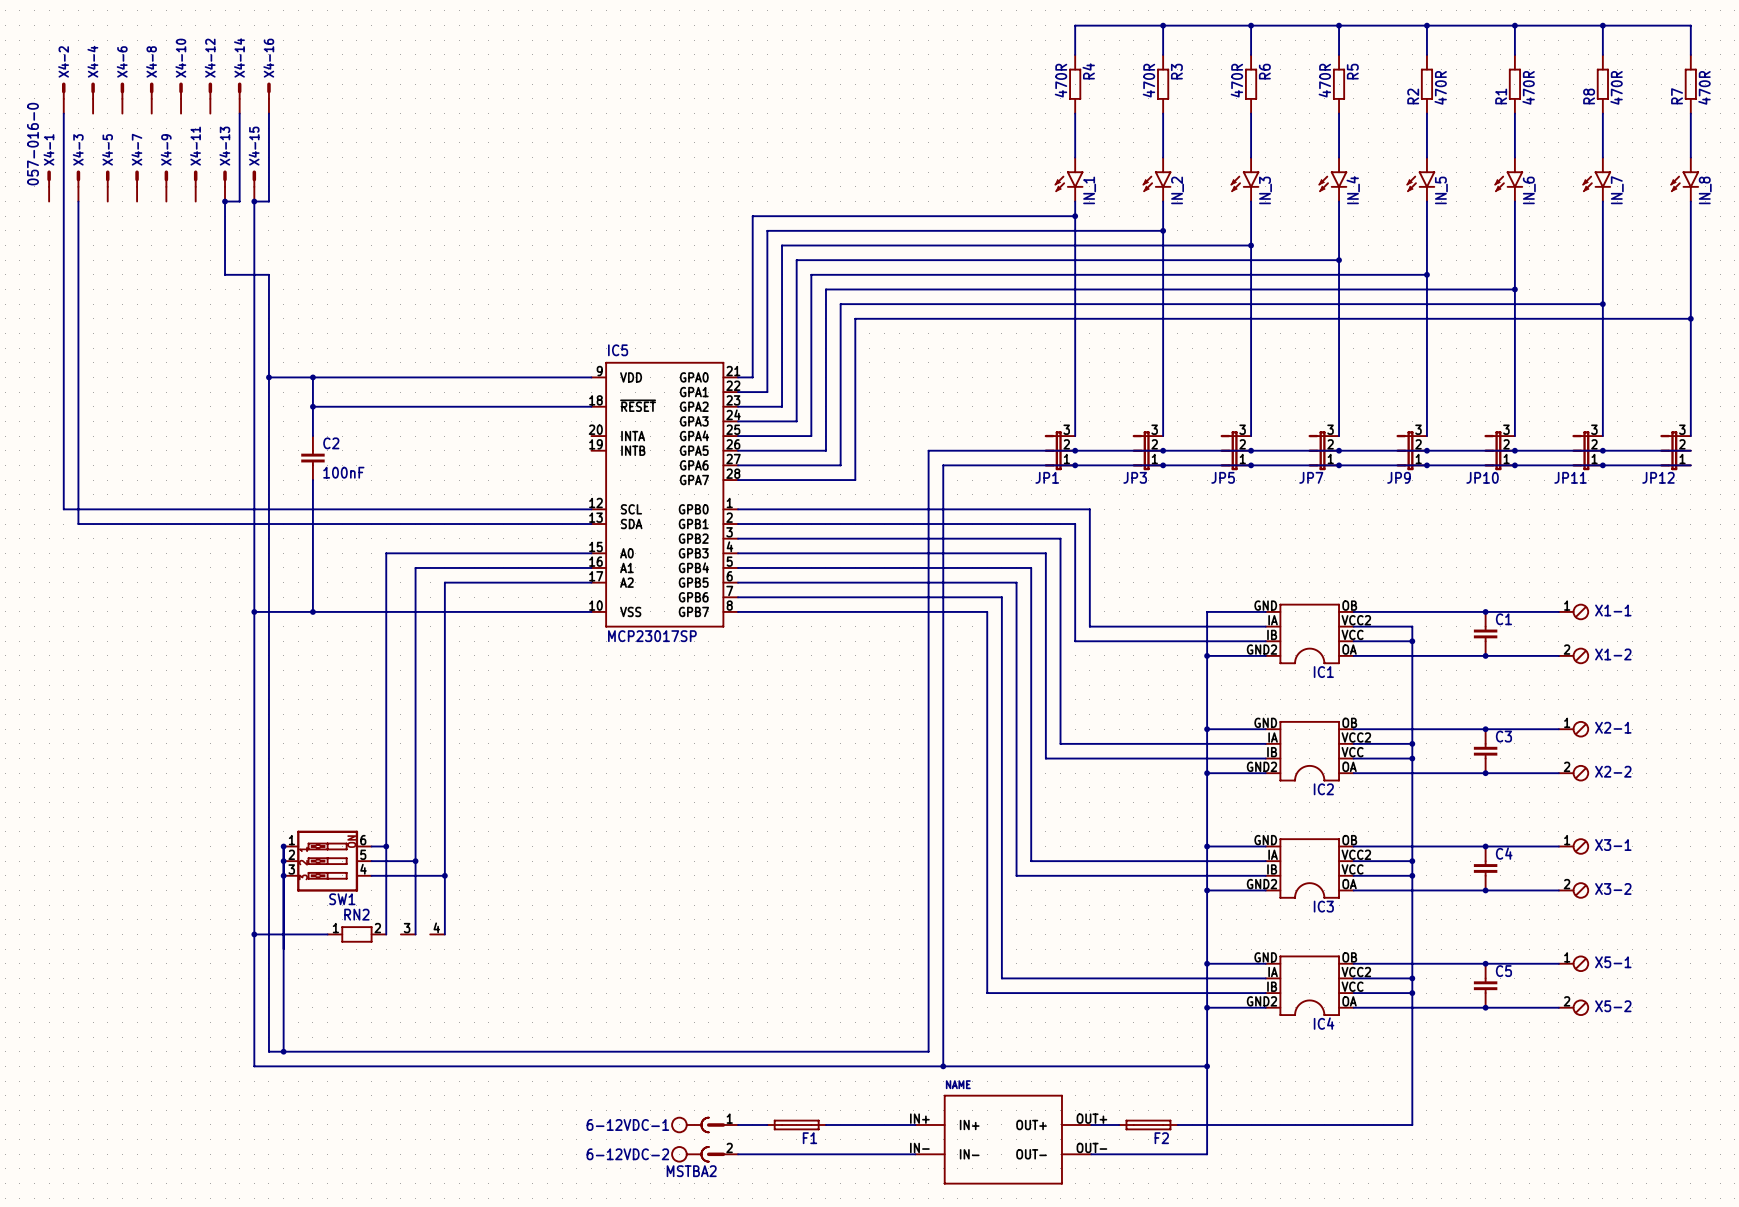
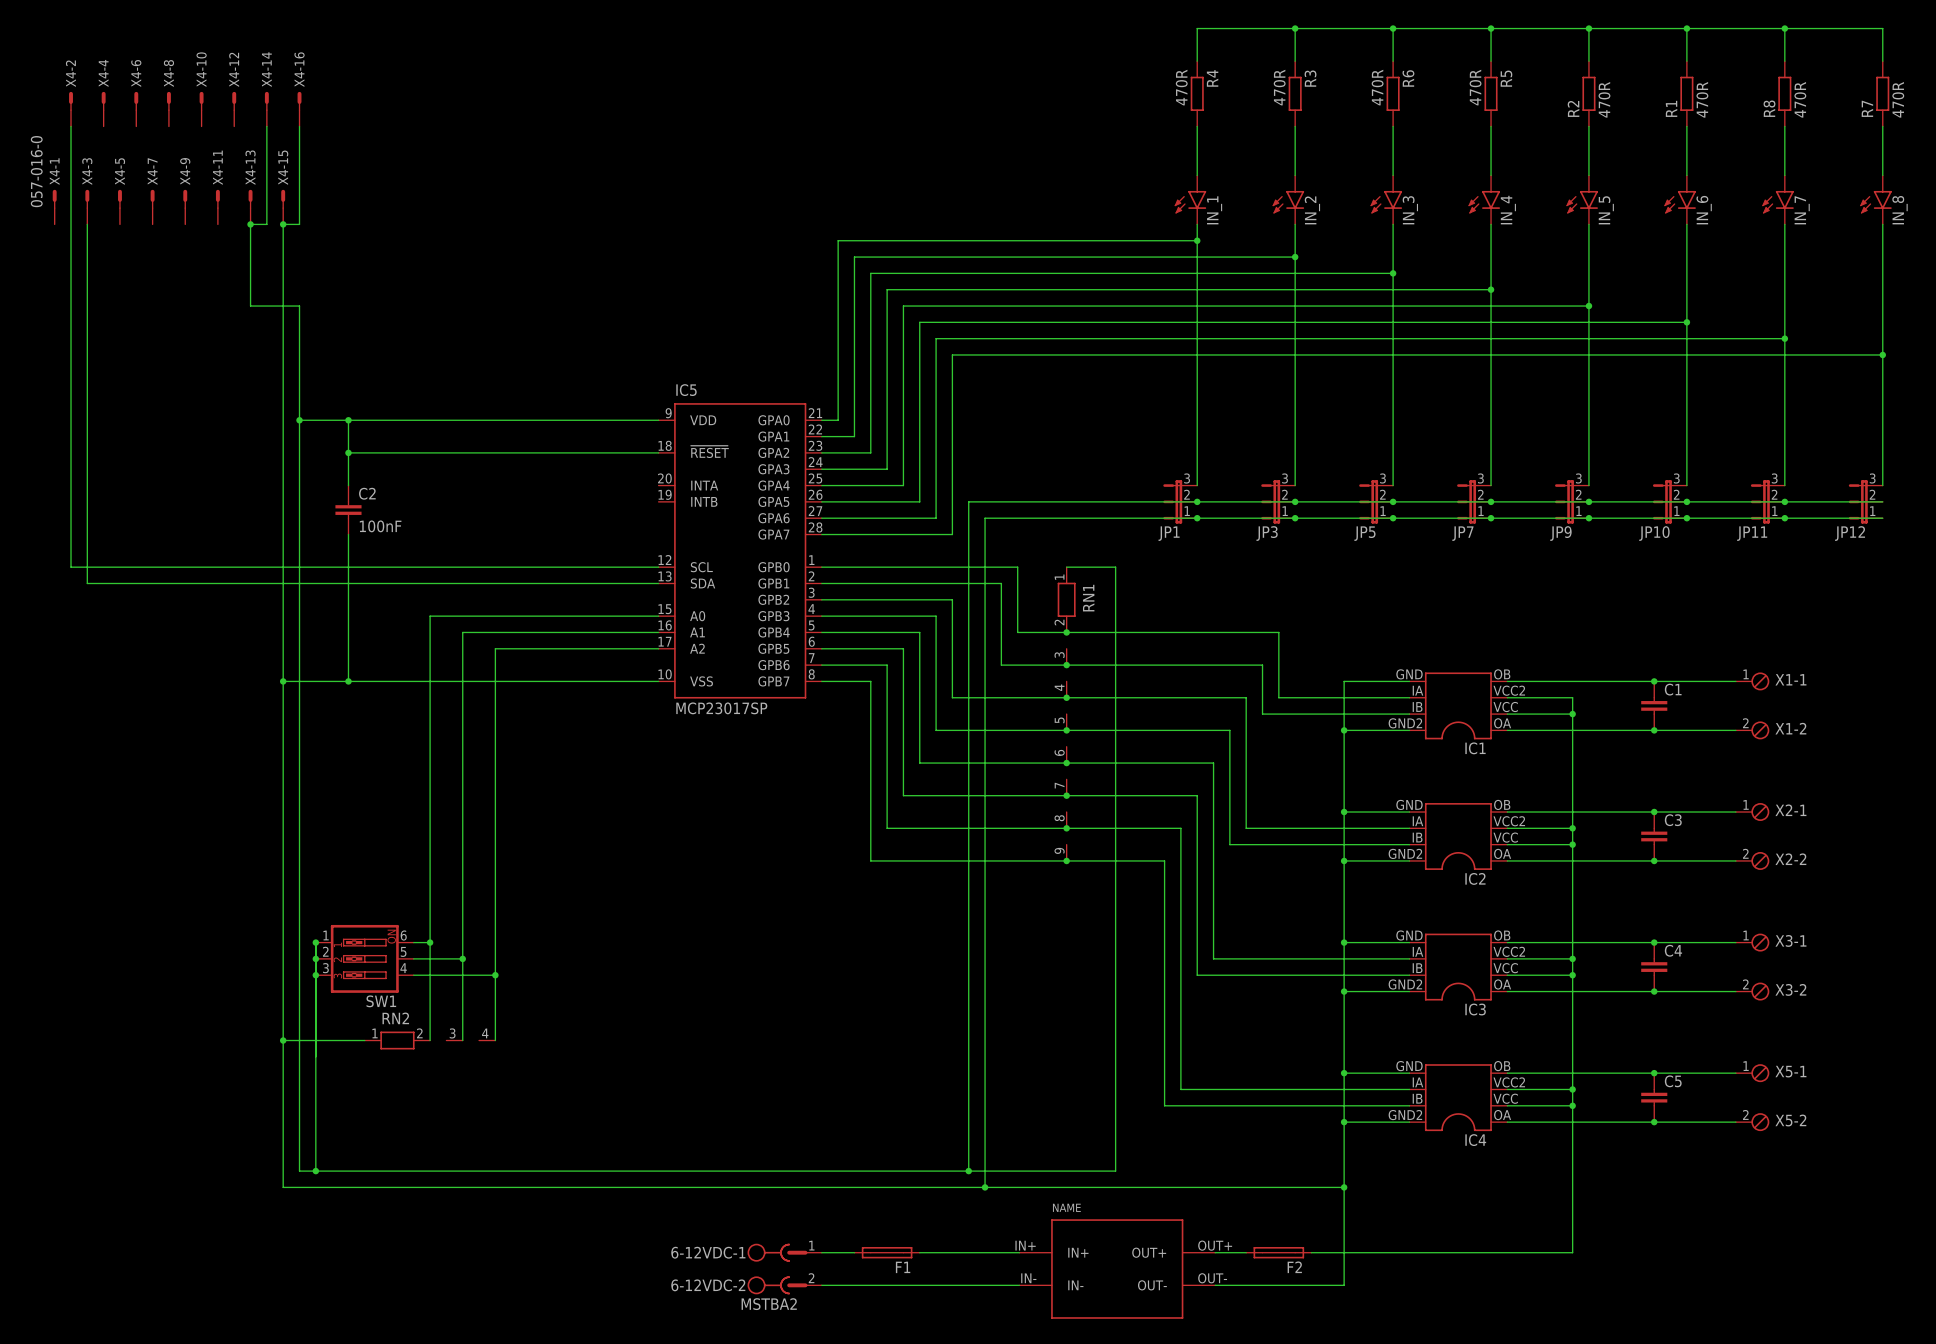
wire: (928, 450) (928, 1051) -> (1034, 501) (968, 501) (968, 1171)
wire: (943, 465) (943, 1066) -> (1050, 518) (985, 518) (985, 1187)
wire: (913, 509) (957, 509) -> (1017, 567) (1017, 632)
wire: (1001, 509) (1089, 509) (1089, 626) -> (1115, 567) (1115, 665) (1262, 665) (1262, 714)
wire: (899, 524) (1075, 524) (1075, 641) (1133, 641) -> none
wire: (855, 538) (1060, 538) (1060, 743) (1119, 743) -> (952, 599) (952, 697) (1213, 697)
wire: (840, 553) (1045, 553) (1045, 758) (1104, 758) -> (936, 616) (936, 730) (1229, 730) (1229, 844)
wire: (825, 567) (913, 567) -> none
junction: none -> (1066, 632)
wire: (1031, 567) (1031, 861) (1089, 861) -> (919, 632) (919, 763) (1213, 763) (1213, 958)
wire: (811, 582) (1016, 582) (1016, 875) (1075, 875) -> (903, 648) (903, 795) (1197, 795) (1197, 975)
wire: (796, 597) (899, 597) -> (1001, 583) (1001, 665)
wire: none -> (887, 665) (887, 828) (1180, 828) (1180, 1089)
junction: none -> (1066, 665)
wire: (782, 611) (987, 611) (987, 993) (1045, 993) -> (870, 681) (870, 860) (1164, 860) (1164, 1105)
junction: none -> (1066, 697)
wire: (1119, 626) (1148, 626) -> (1148, 632) (1278, 632) (1278, 697)
wire: none -> (1246, 697) (1246, 828)
RN1: none -> (1066, 714)
junction: none -> (1066, 730)
junction: none -> (1066, 763)
junction: none -> (1066, 795)
junction: none -> (1066, 828)
junction: none -> (1066, 860)
wire: (1001, 978) (1060, 978) -> (1115, 1089) (1115, 1171) (1034, 1171)
junction: none -> (968, 1171)
junction: none -> (985, 1187)
junction: (943, 1066) -> none

